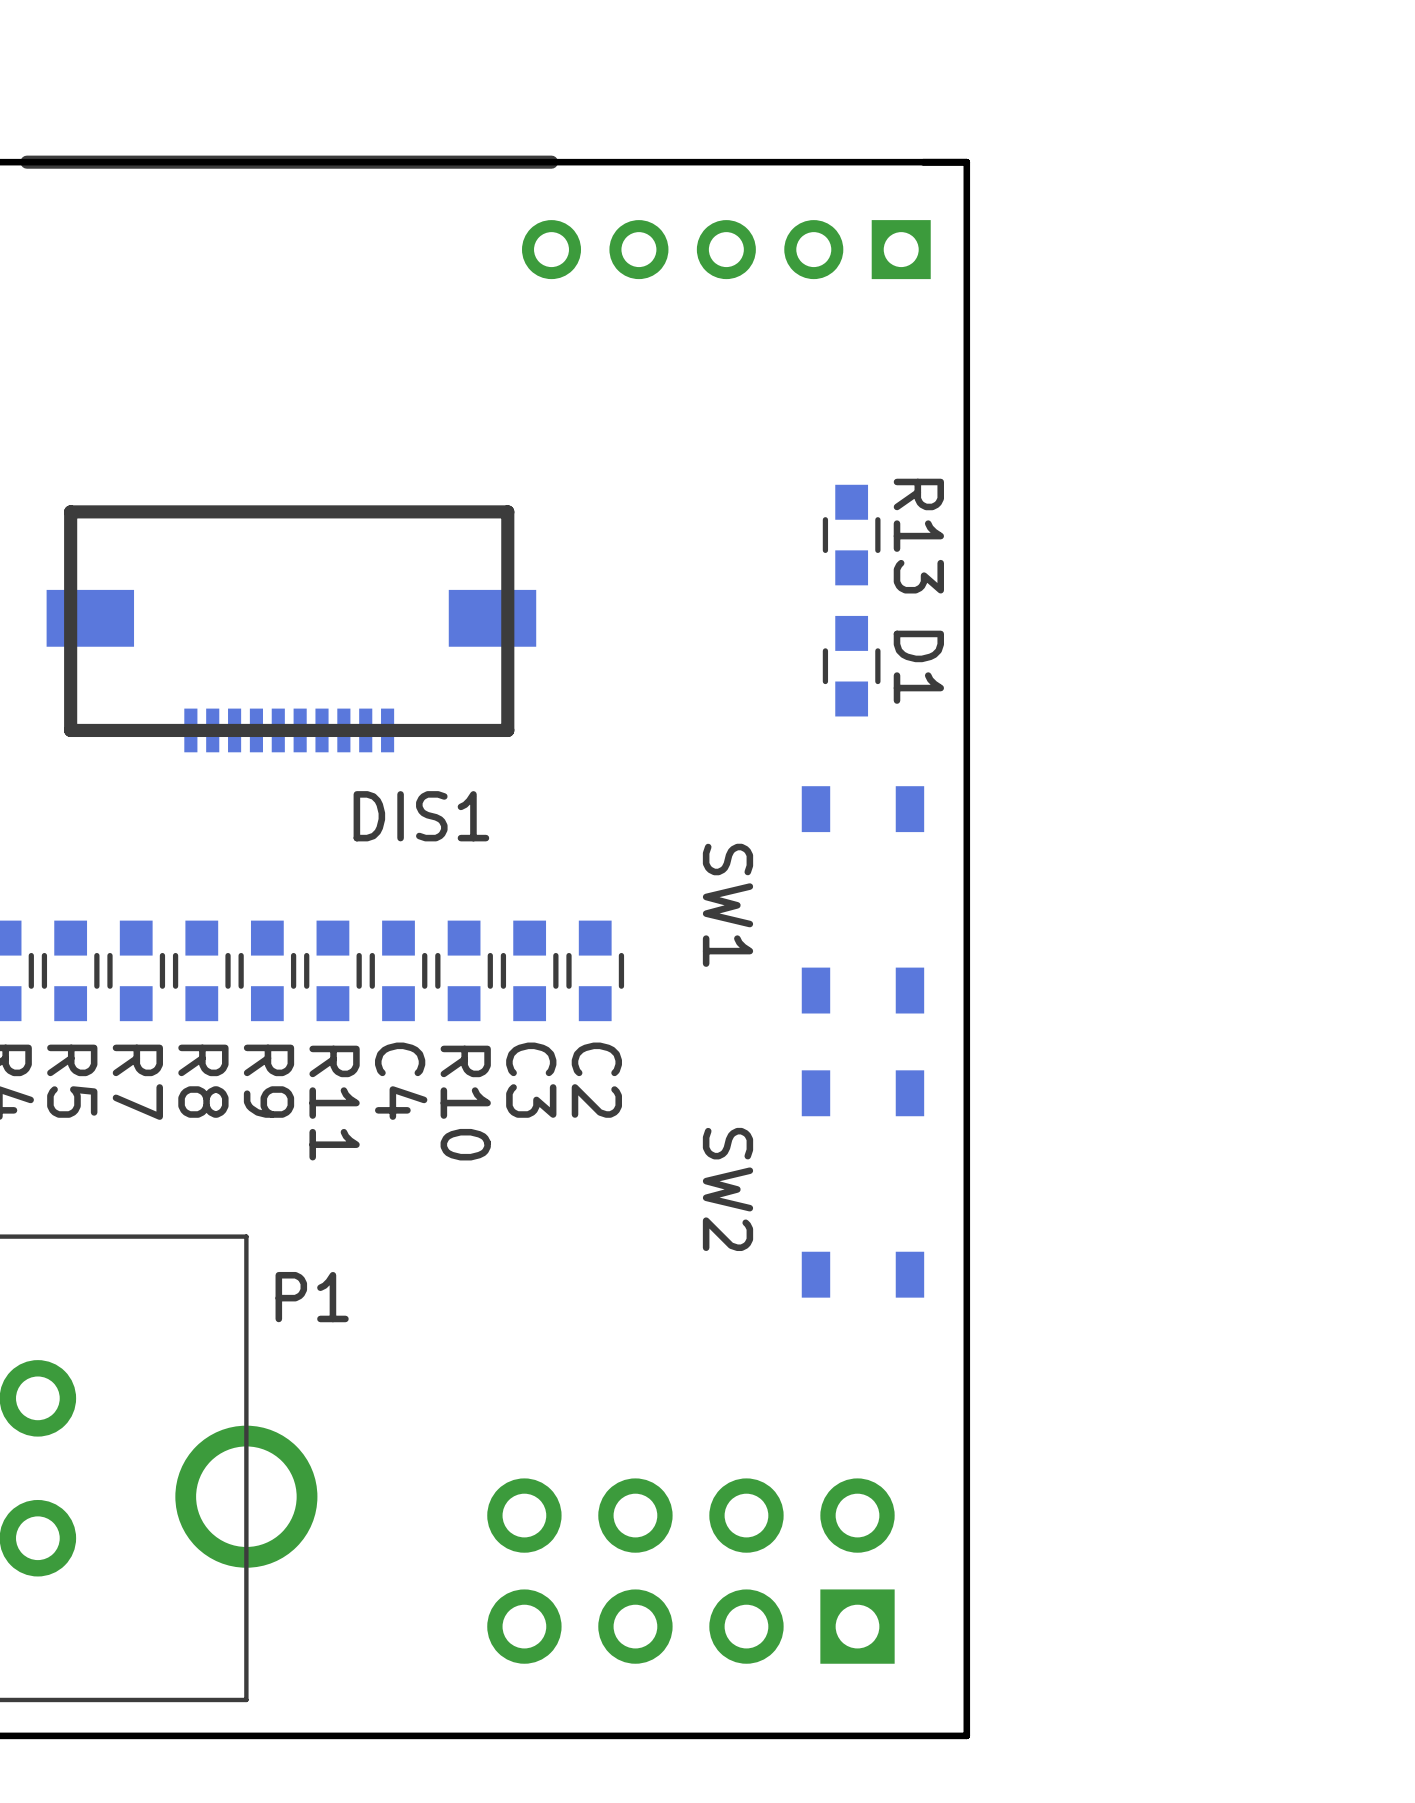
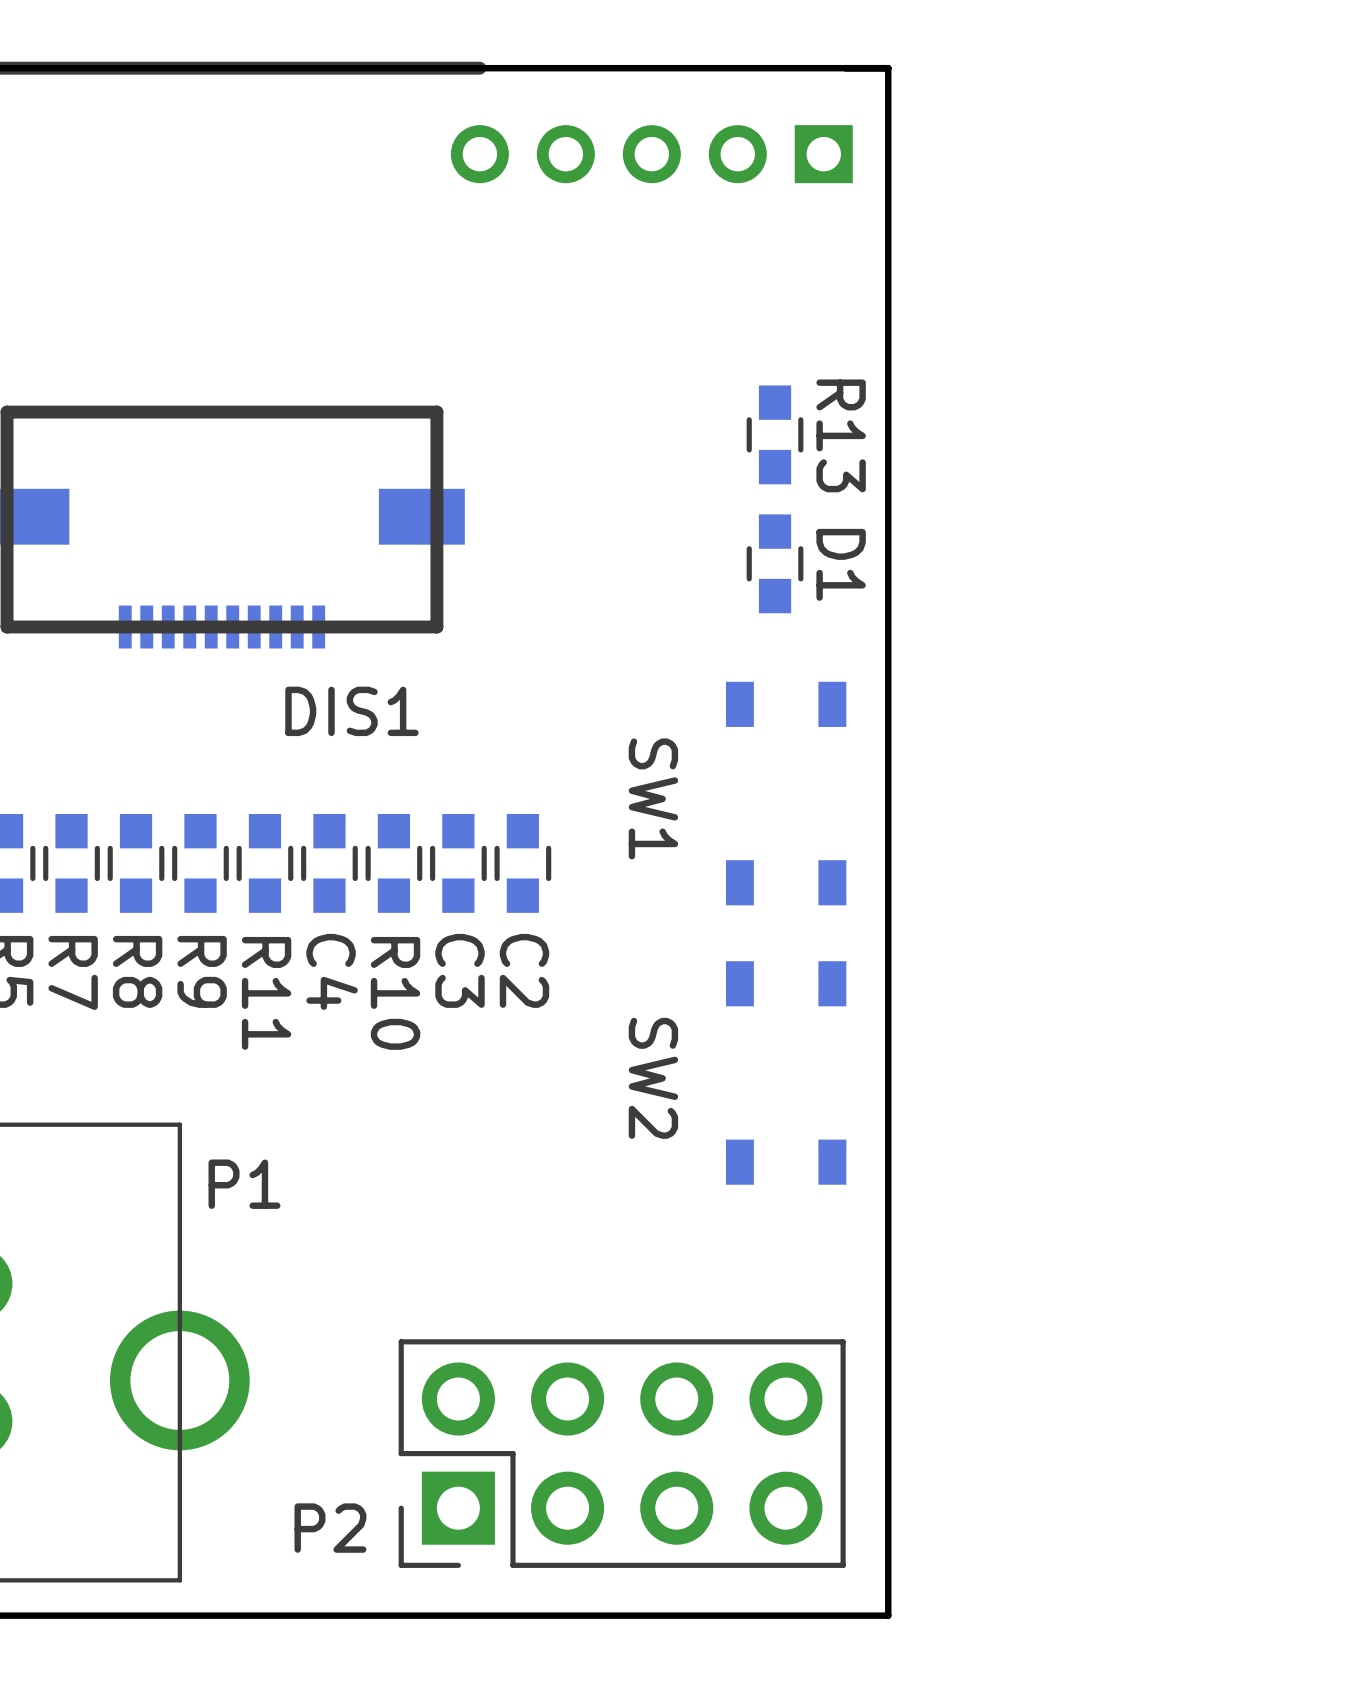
P2 side: top (690, 1571) -> bottom (622, 1453)

